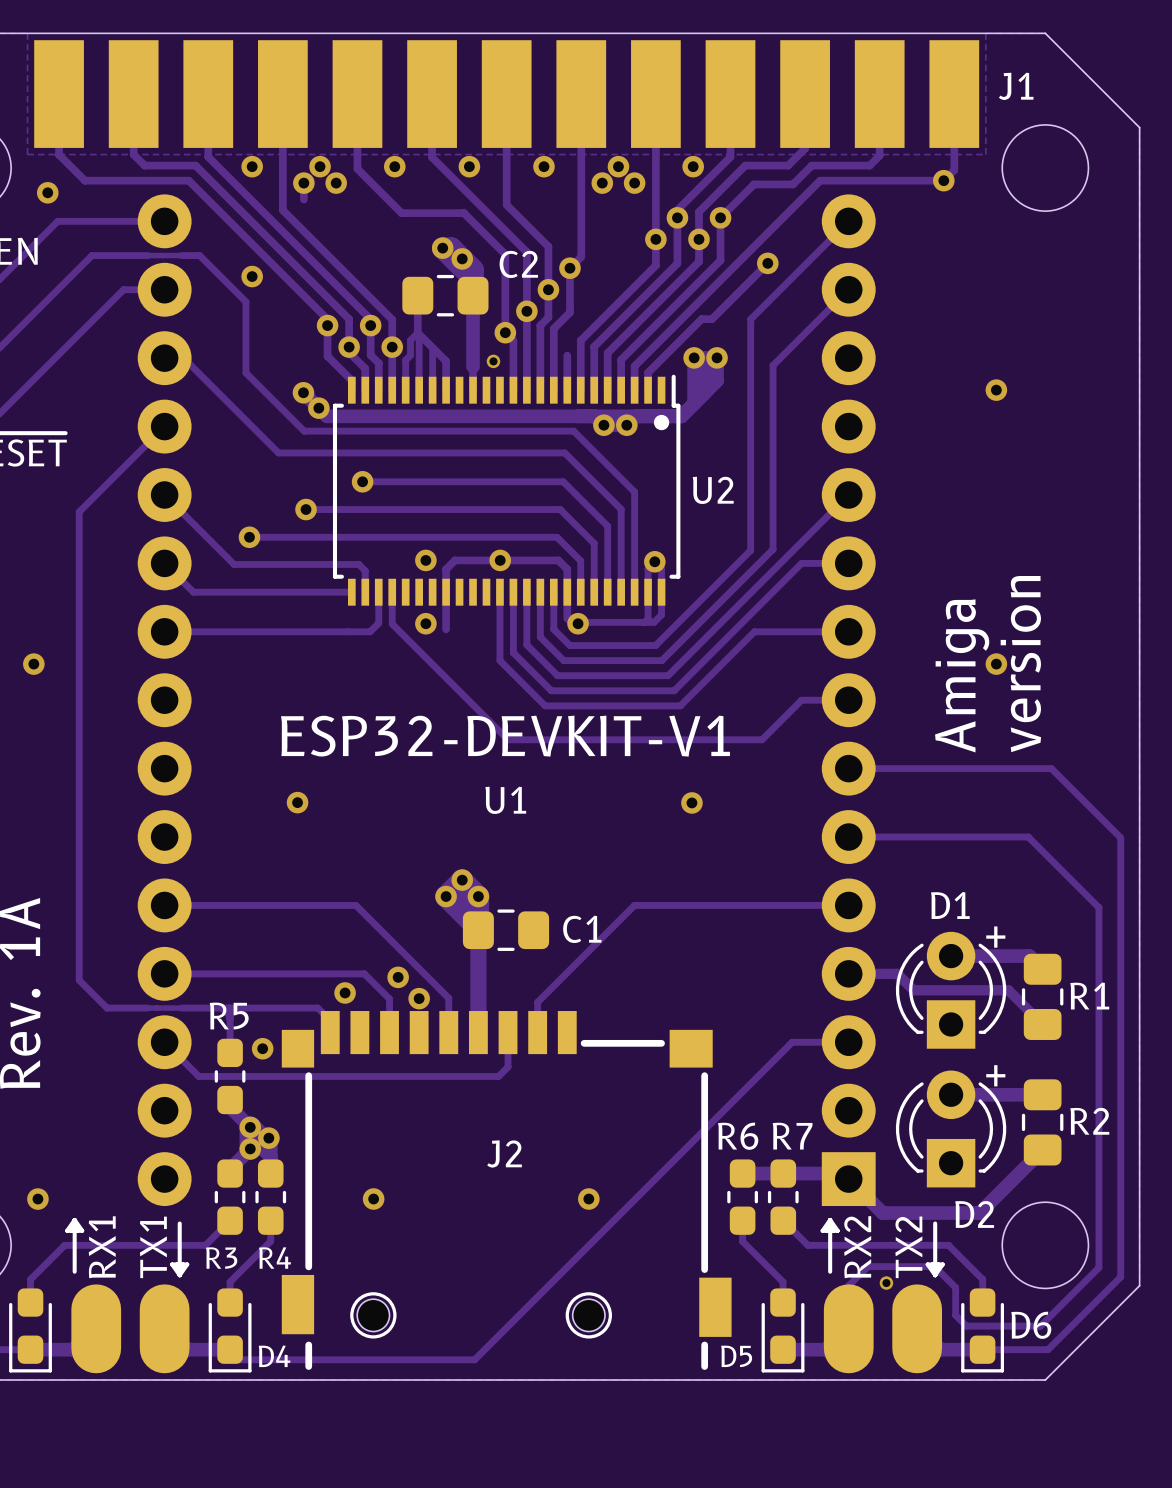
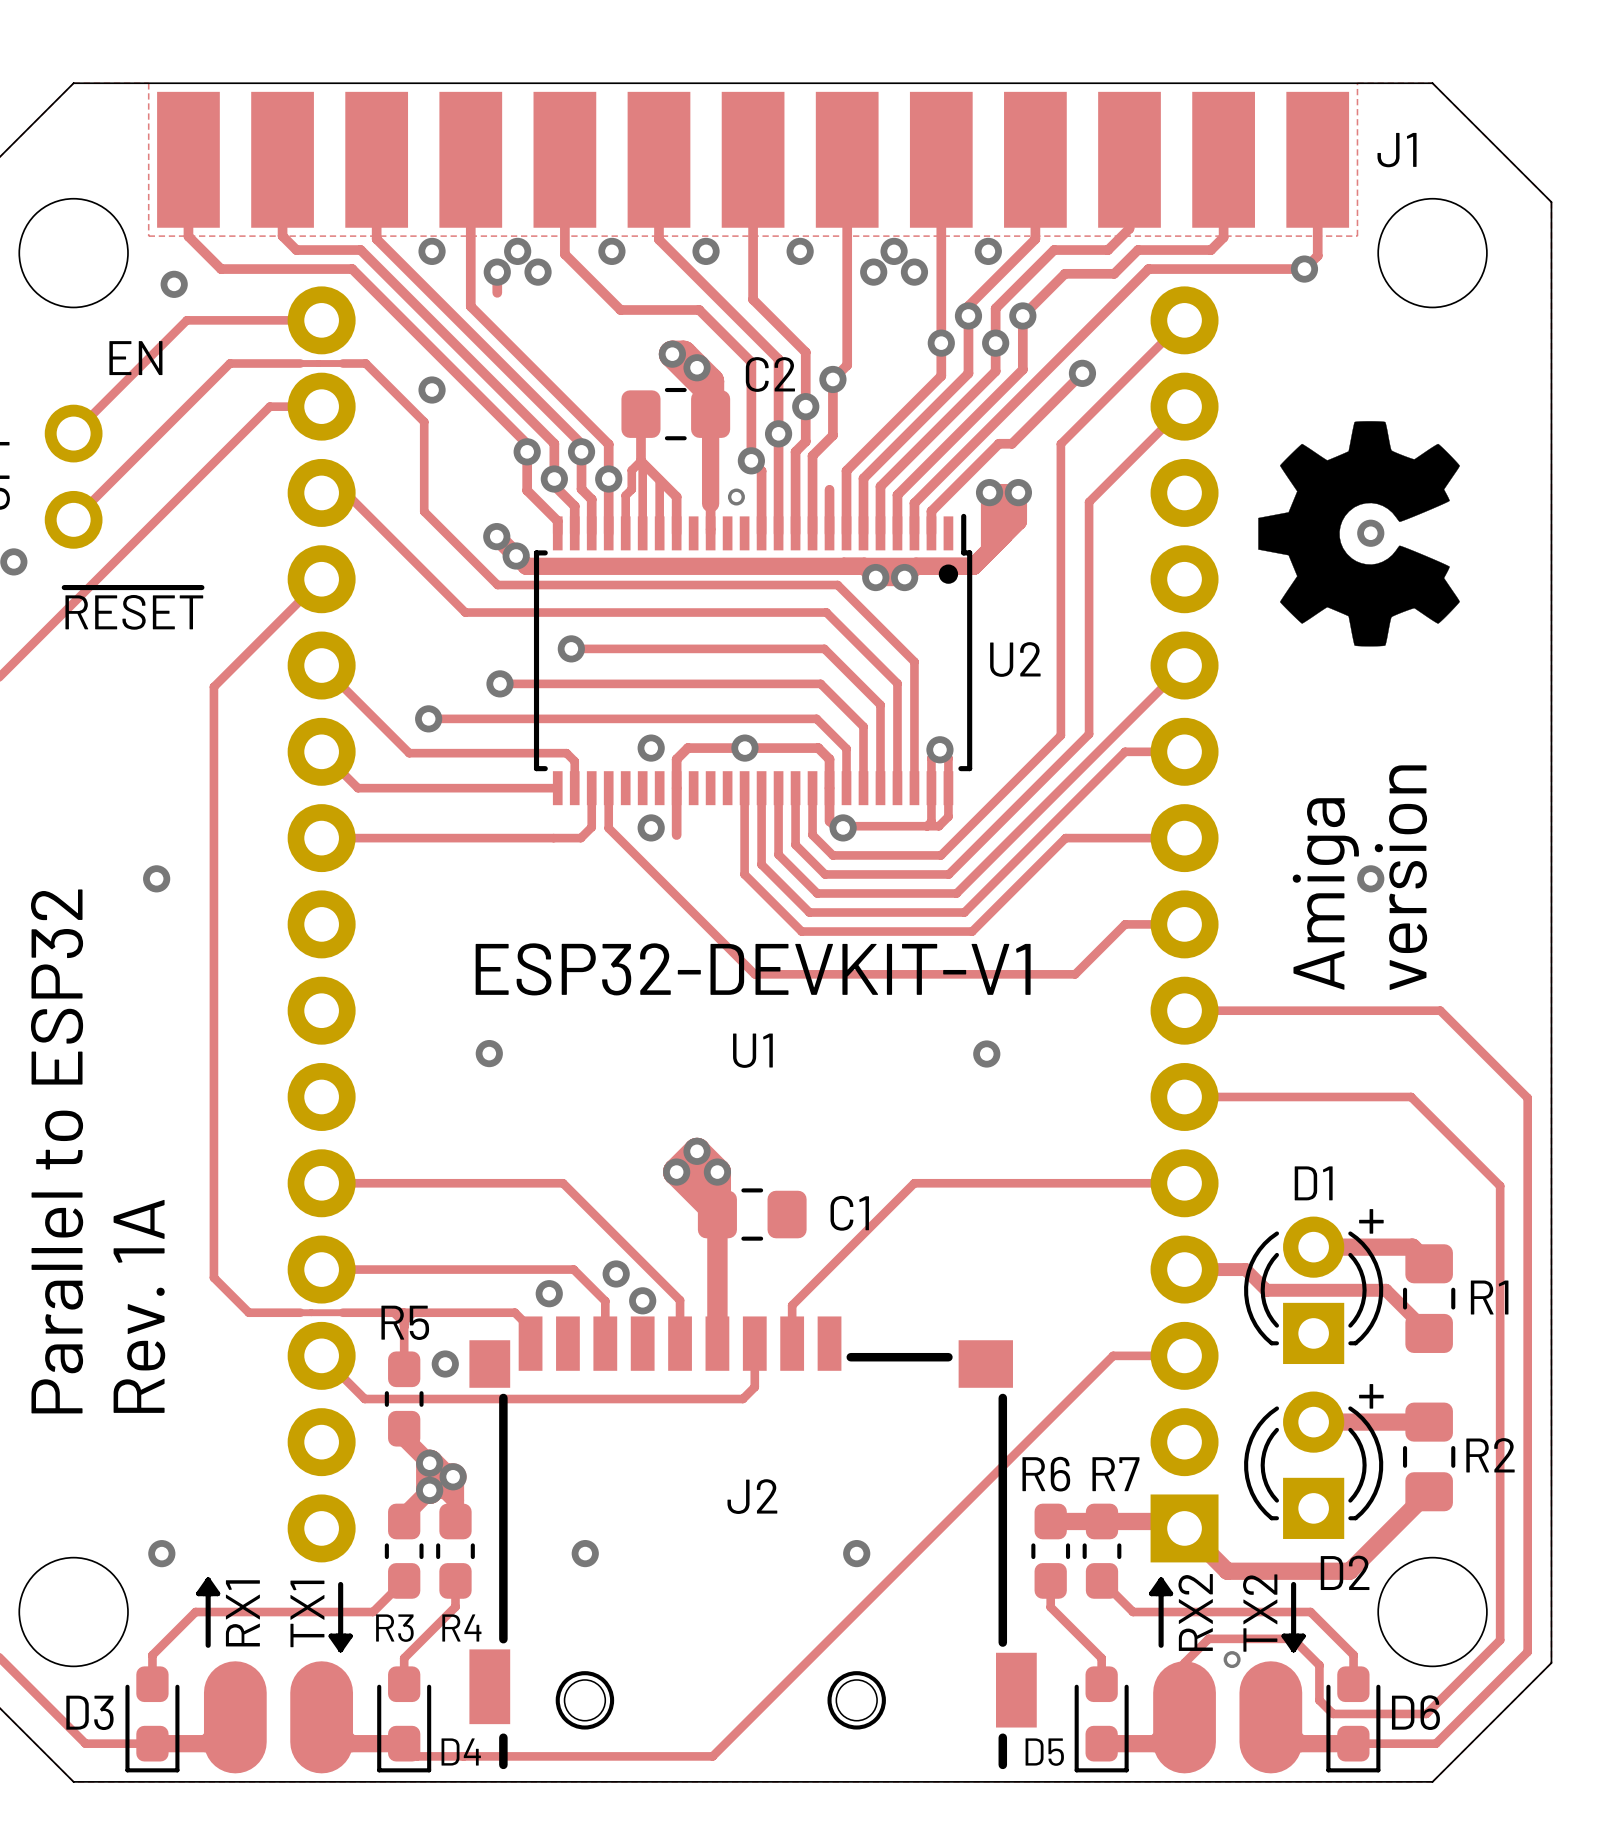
drawing: none -> [1258, 421, 1460, 647]

